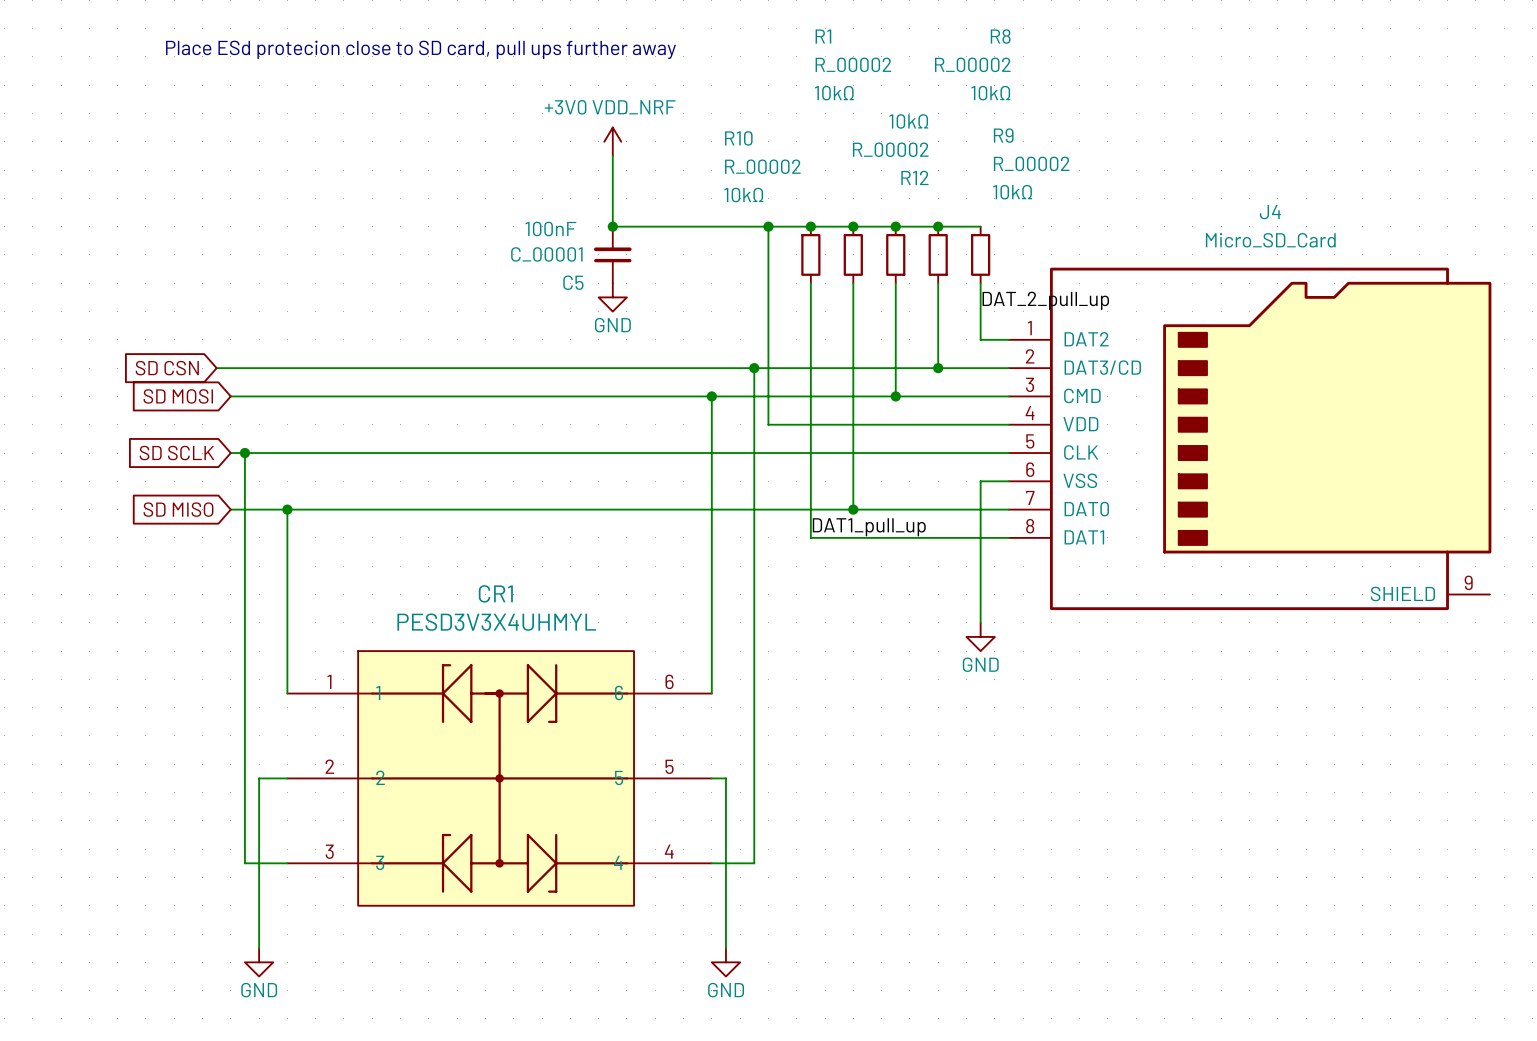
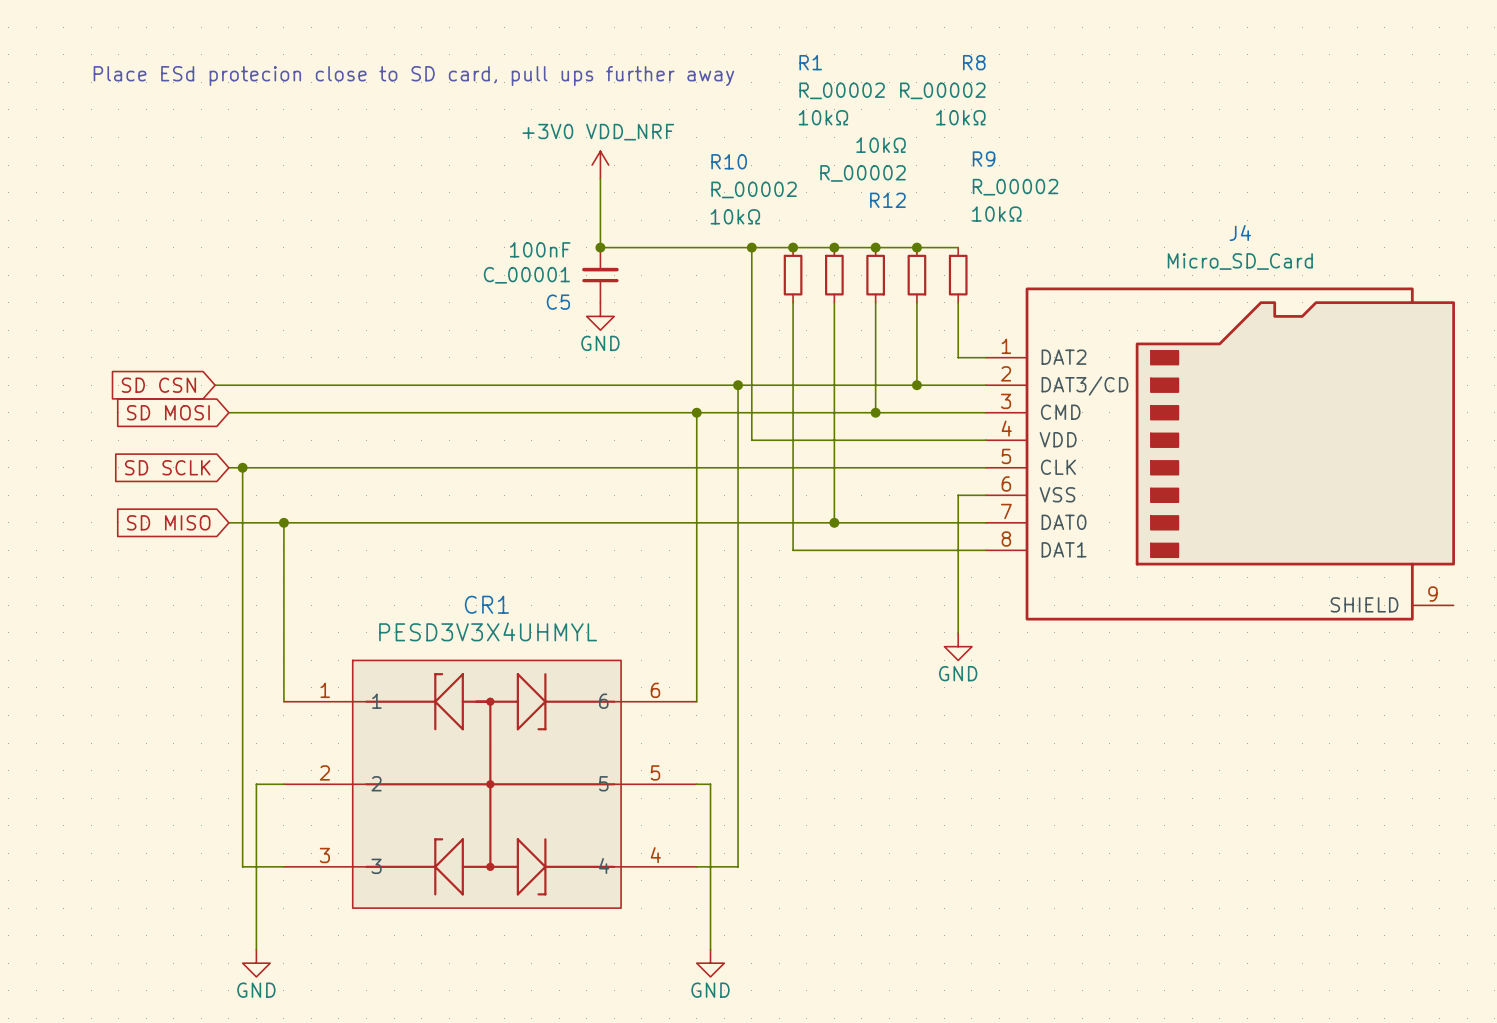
label: DAT_2_pull_up (1045, 300) -> none
label: DAT1_pull_up (869, 527) -> none

